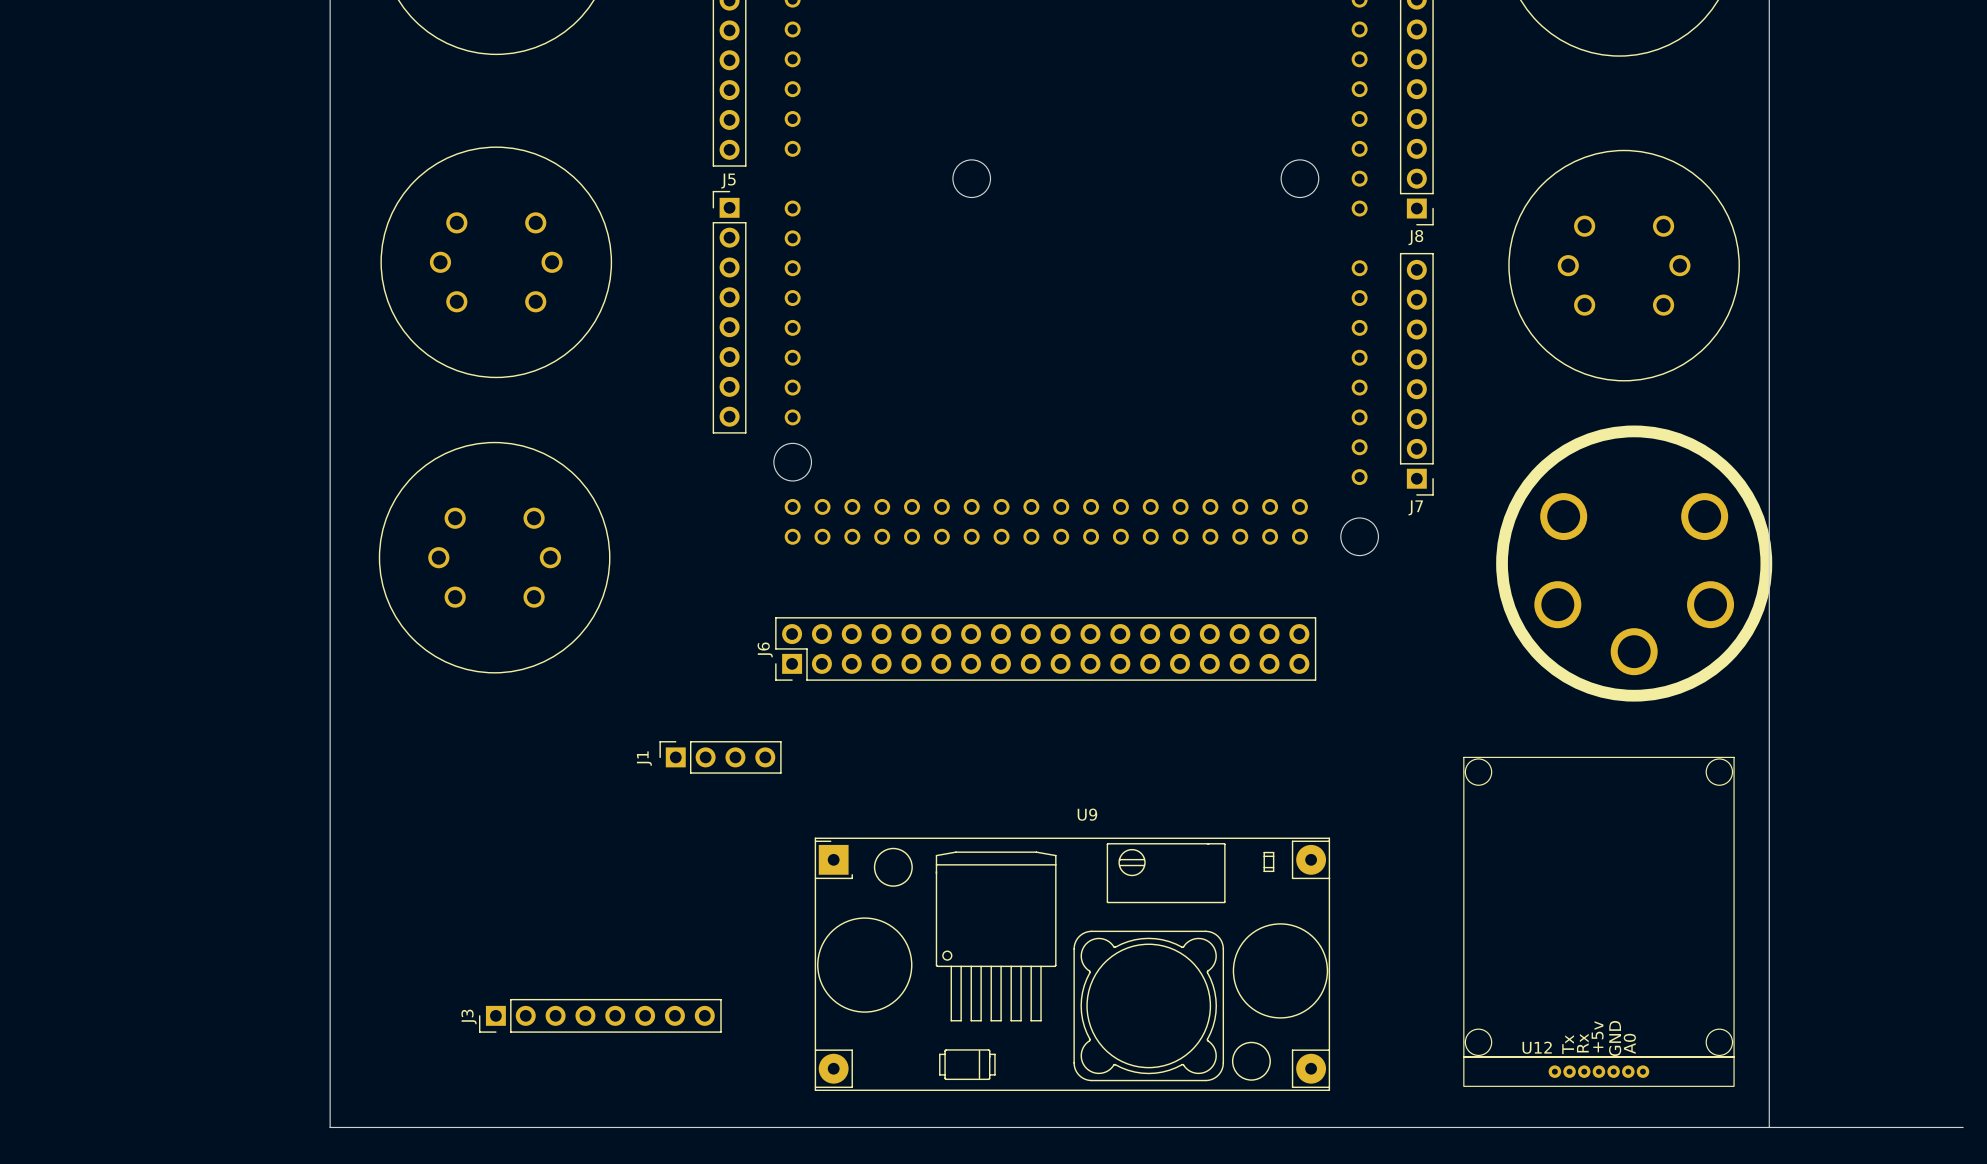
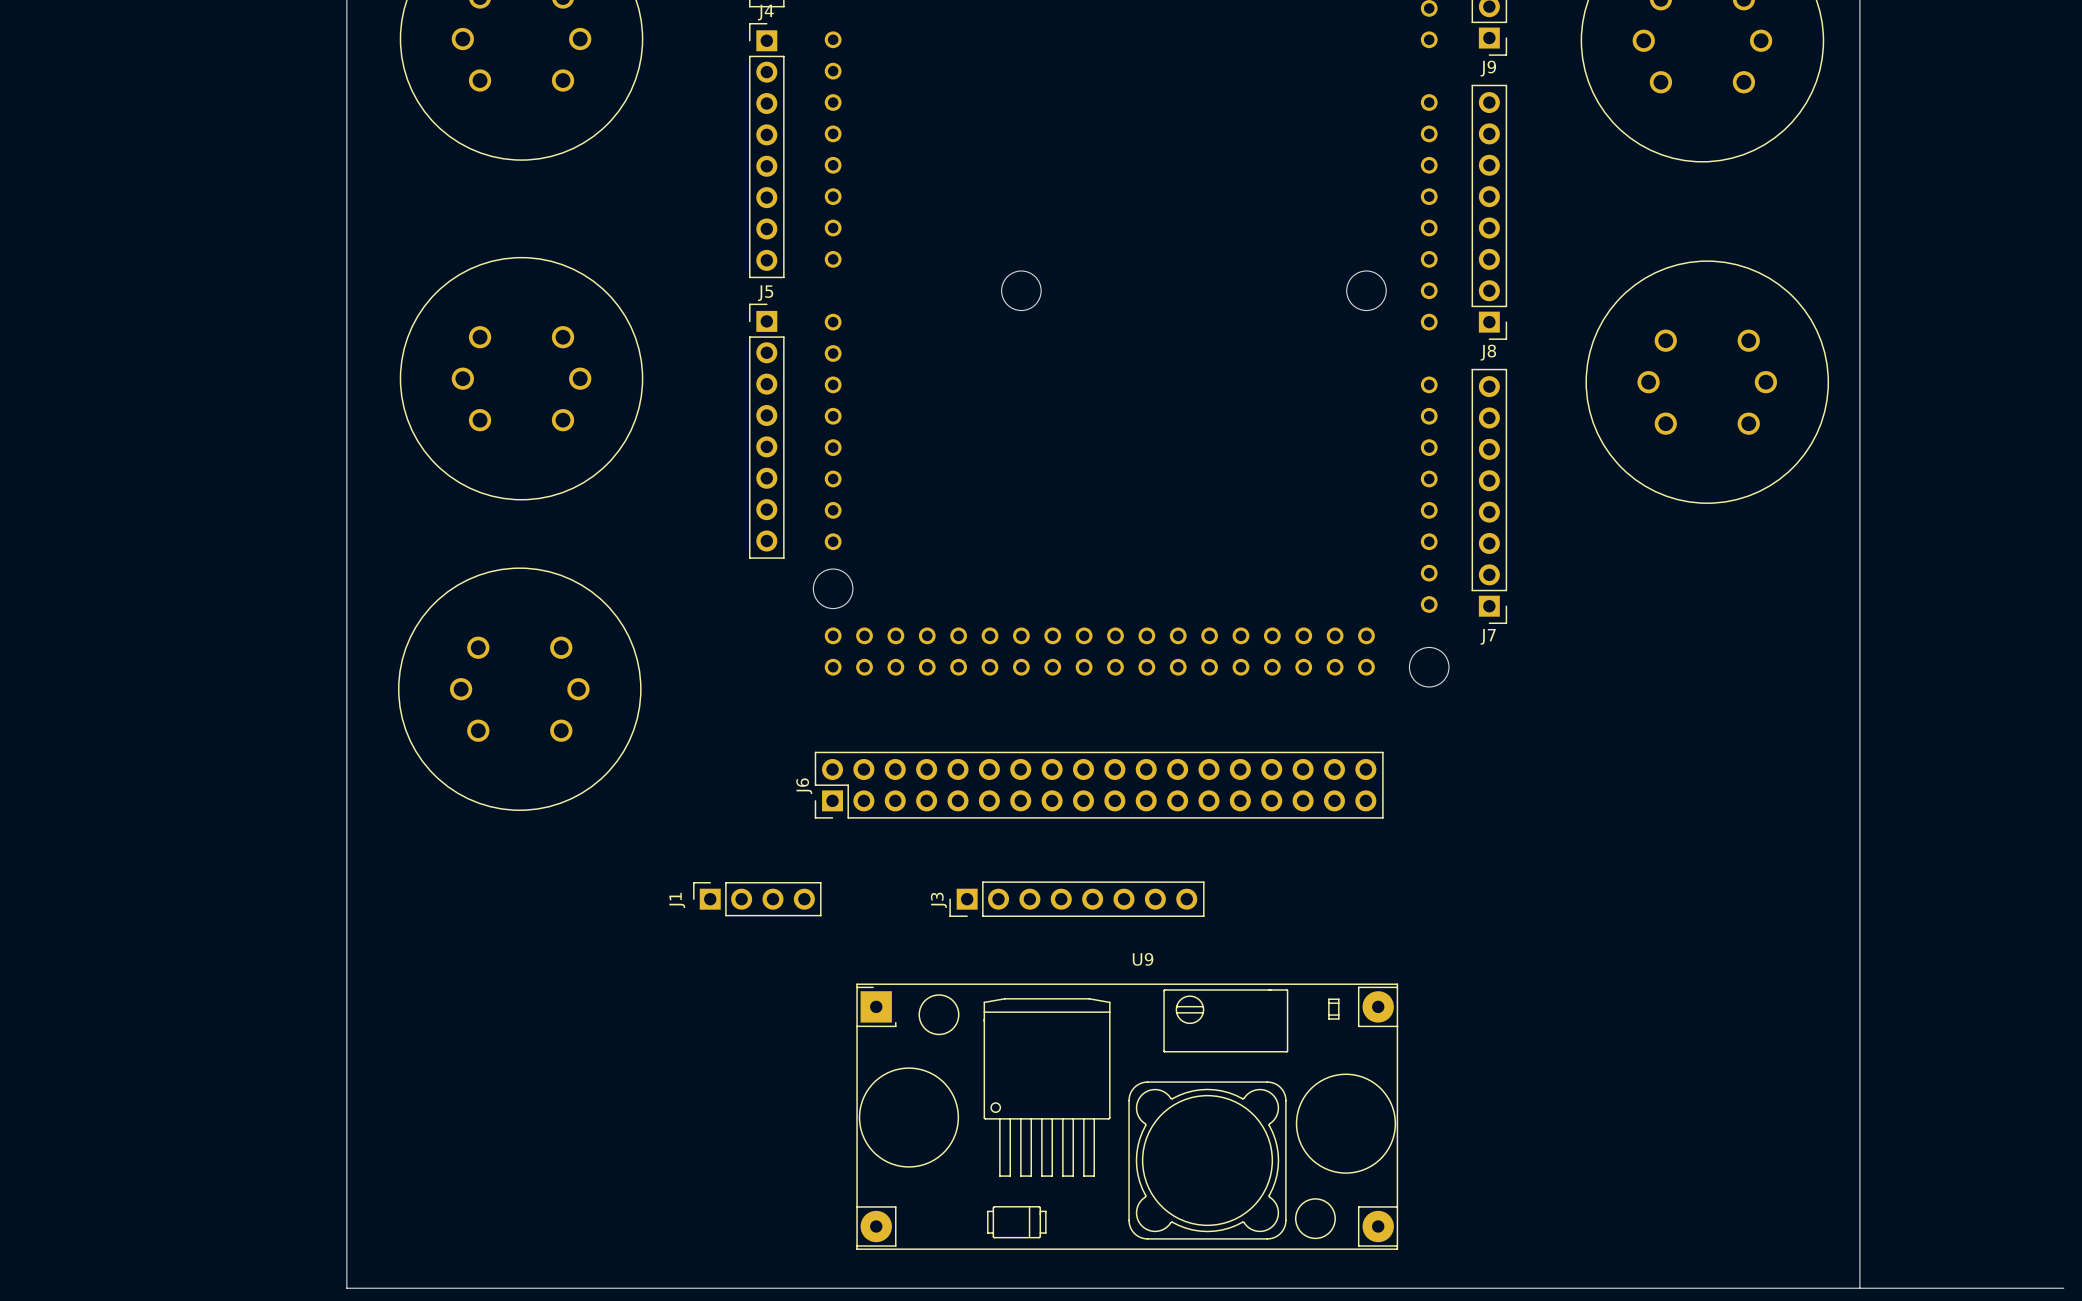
part: (1634, 563) -> none
U12: (1598, 921) -> none
J3 position: (600, 1015) -> (1076, 899)

